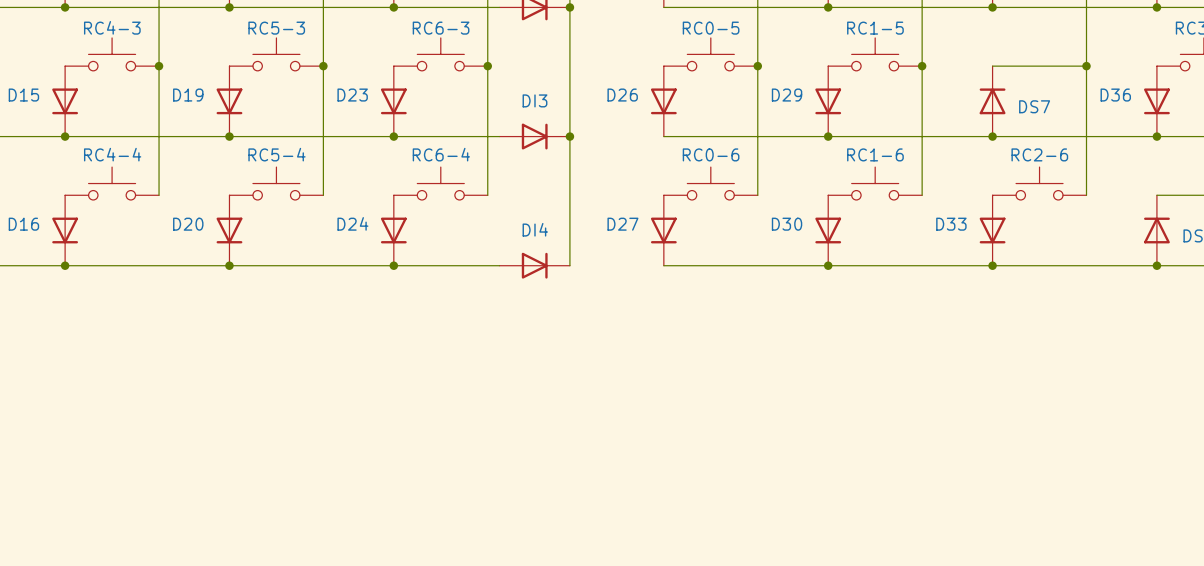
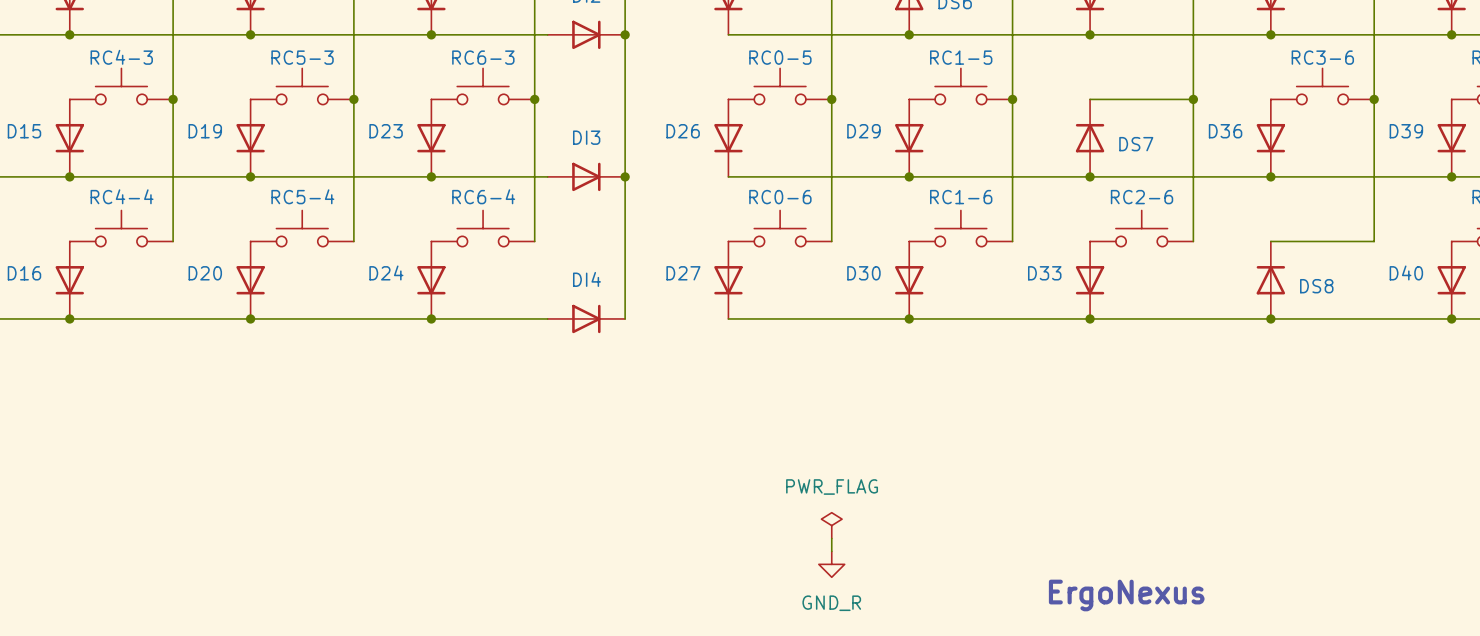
power symbol: none -> PWR_FLAG (831, 525)
wire: none -> (831, 538) (831, 551)
power symbol: none -> GND_R (831, 564)
text: none -> ErgoNexus (1126, 595)

